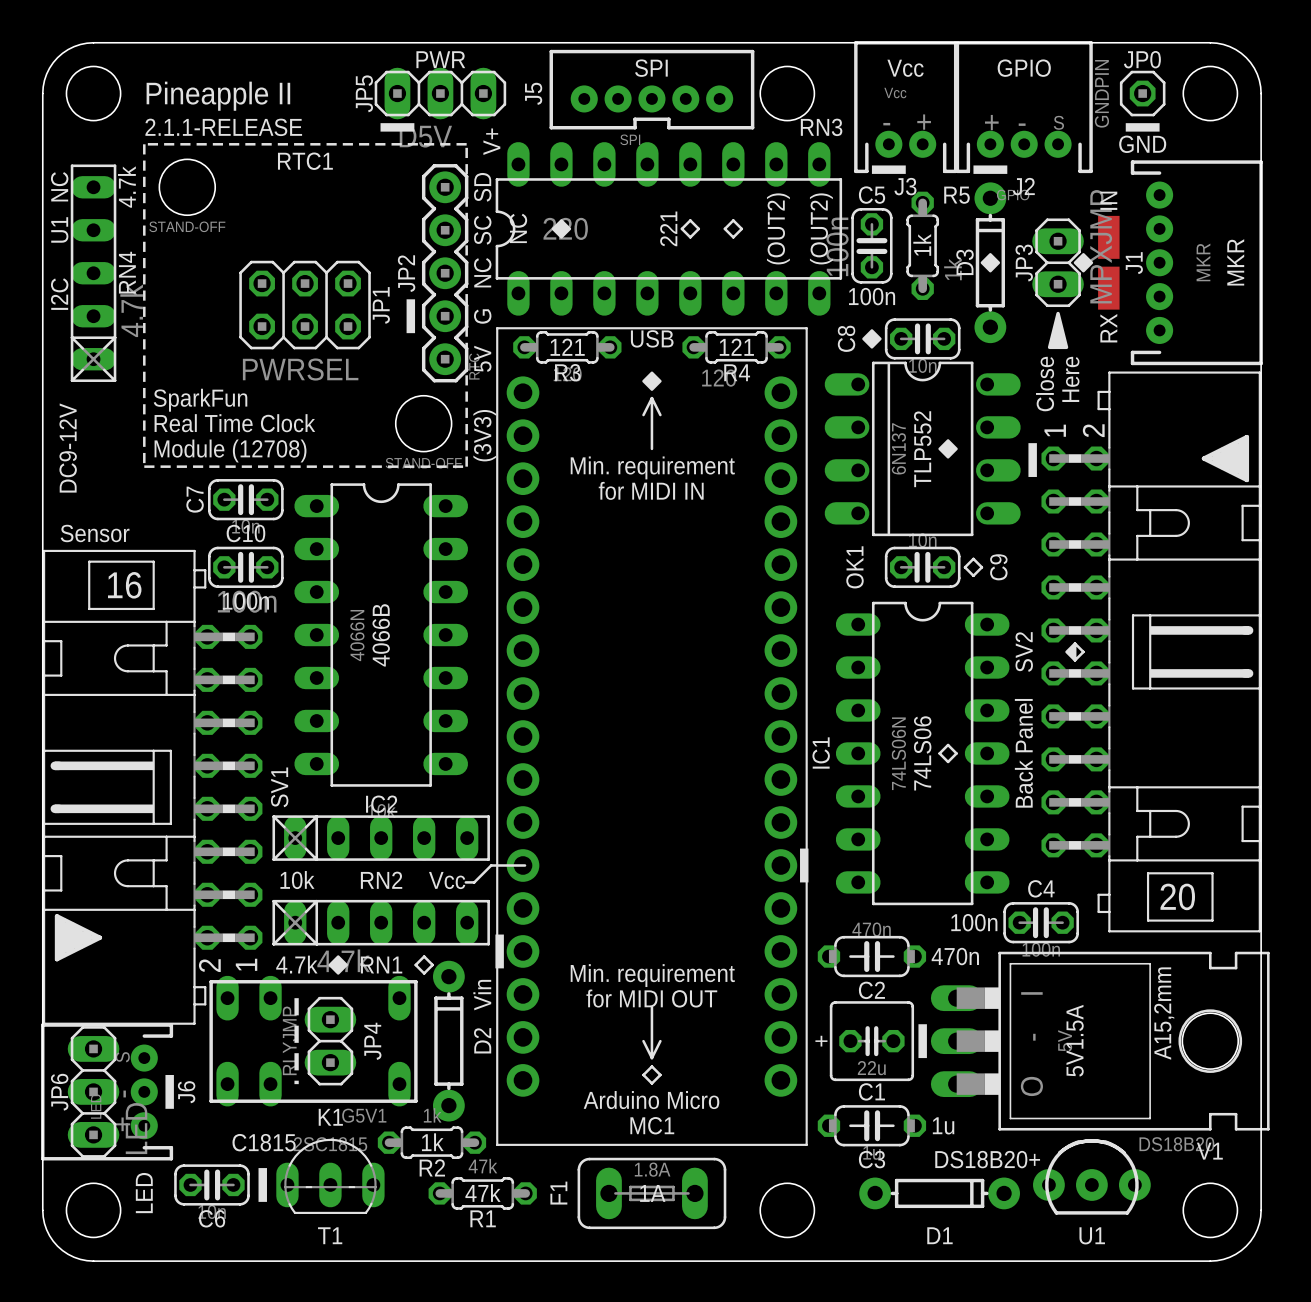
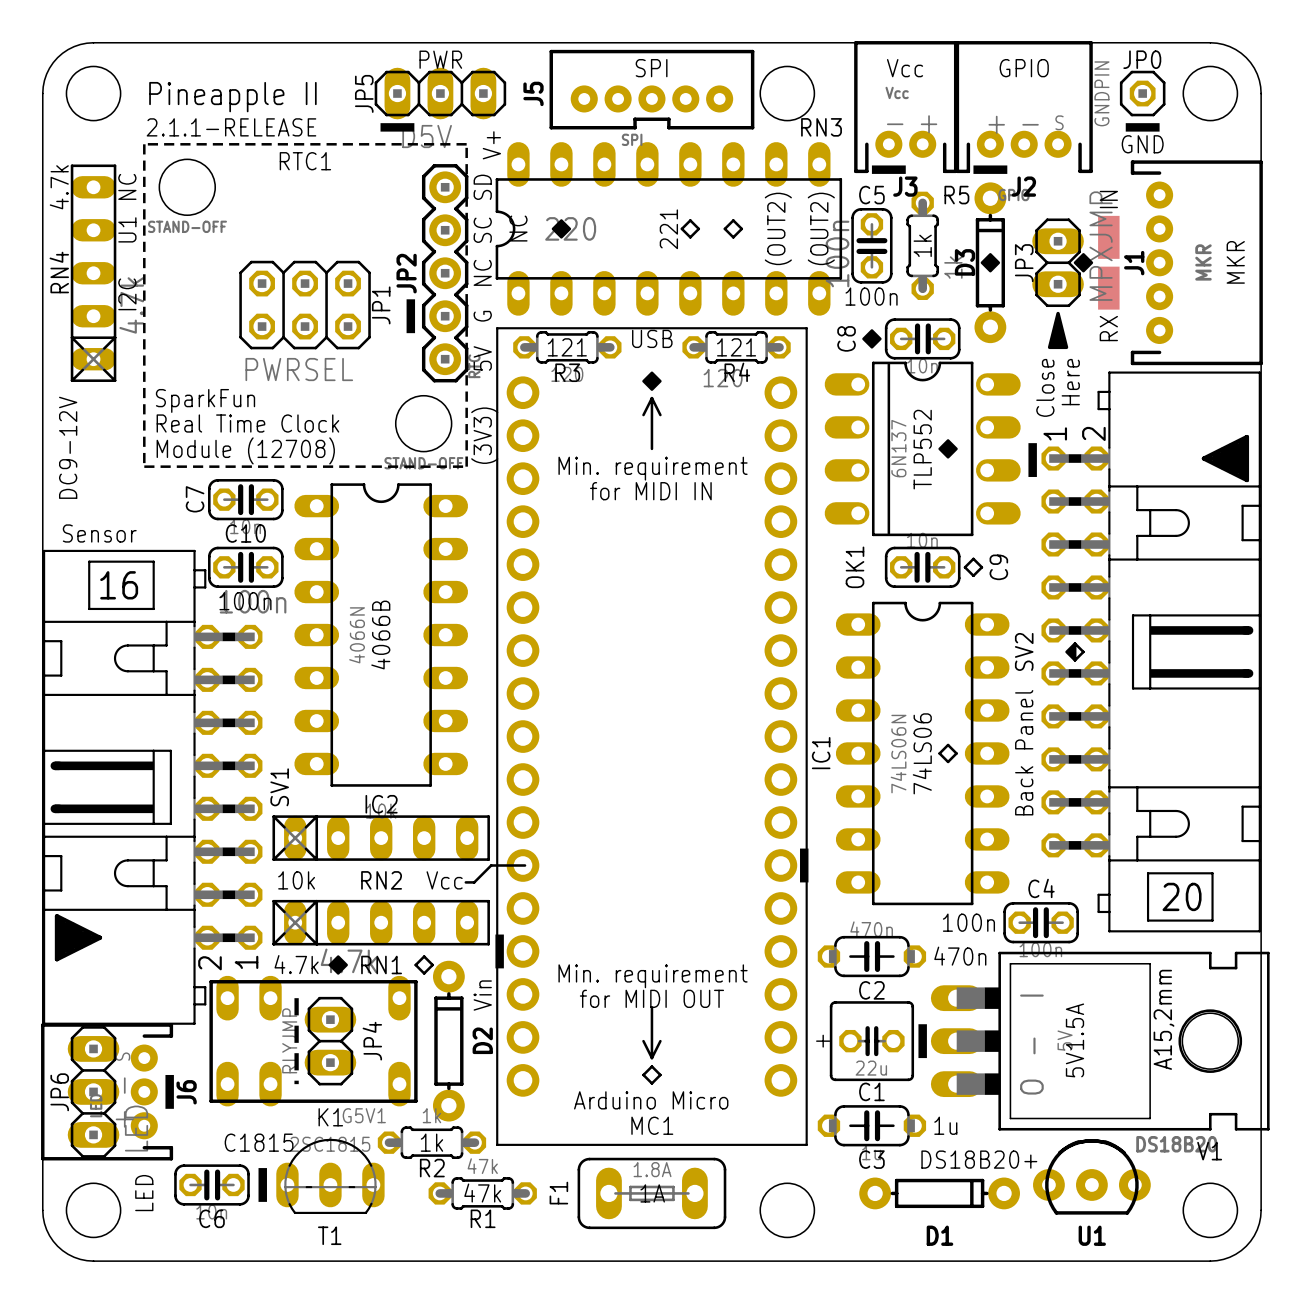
text: NC (59, 186) -> 4.7k (59, 187)
text: 4.7k (126, 187) -> NC (127, 186)
text position: U1 (59, 229) -> U1 (127, 229)
RN4 name position: RN4 (127, 272) -> RN4 (59, 272)
text position: I2C (59, 294) -> I2C (127, 294)

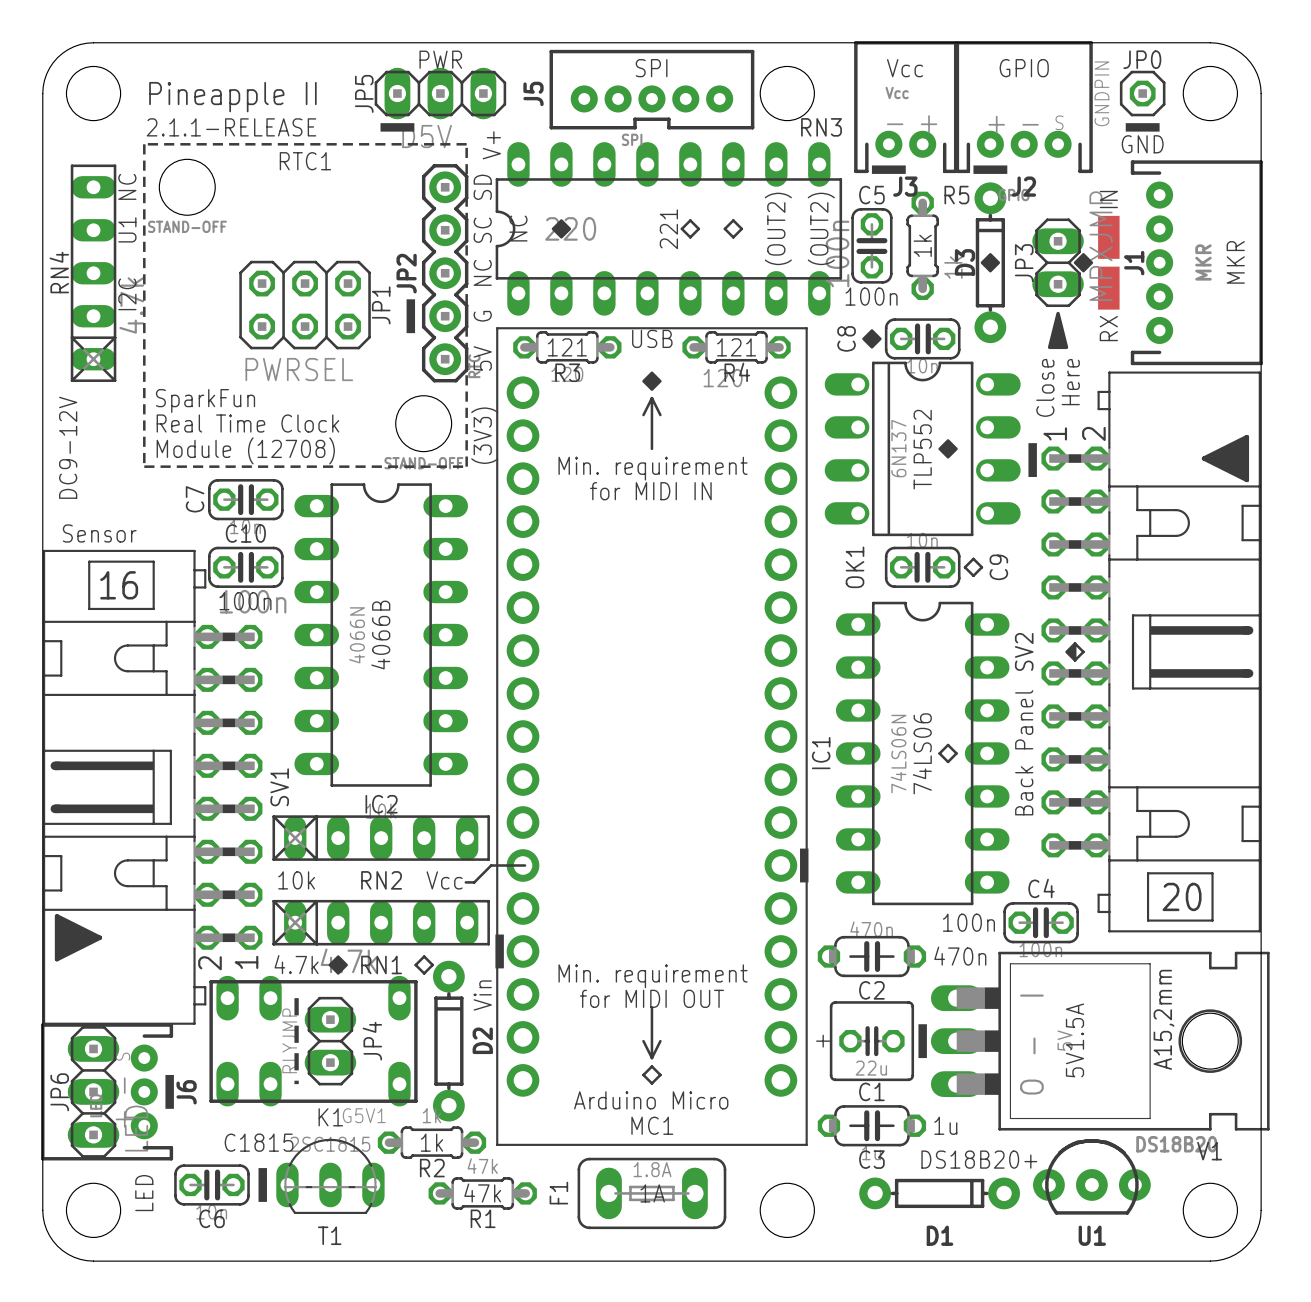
text: 4.7k (59, 187) -> none

